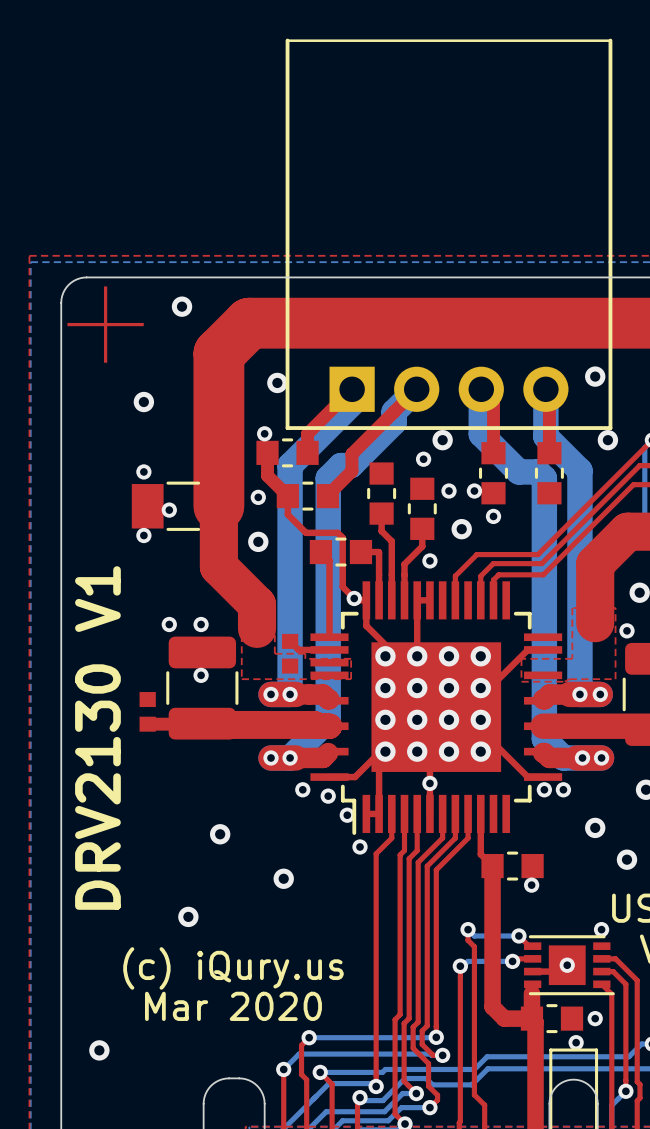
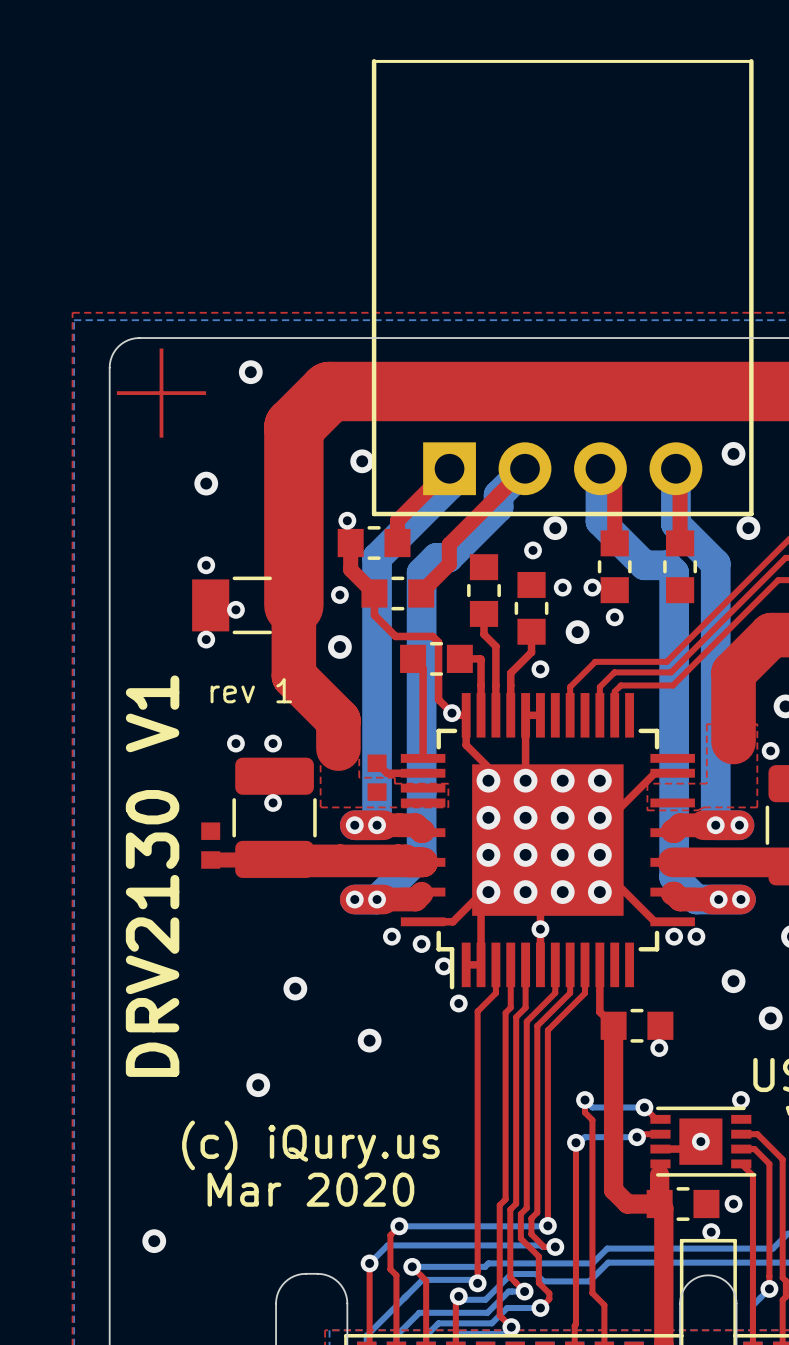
text: none -> rev 1 (251, 690)

